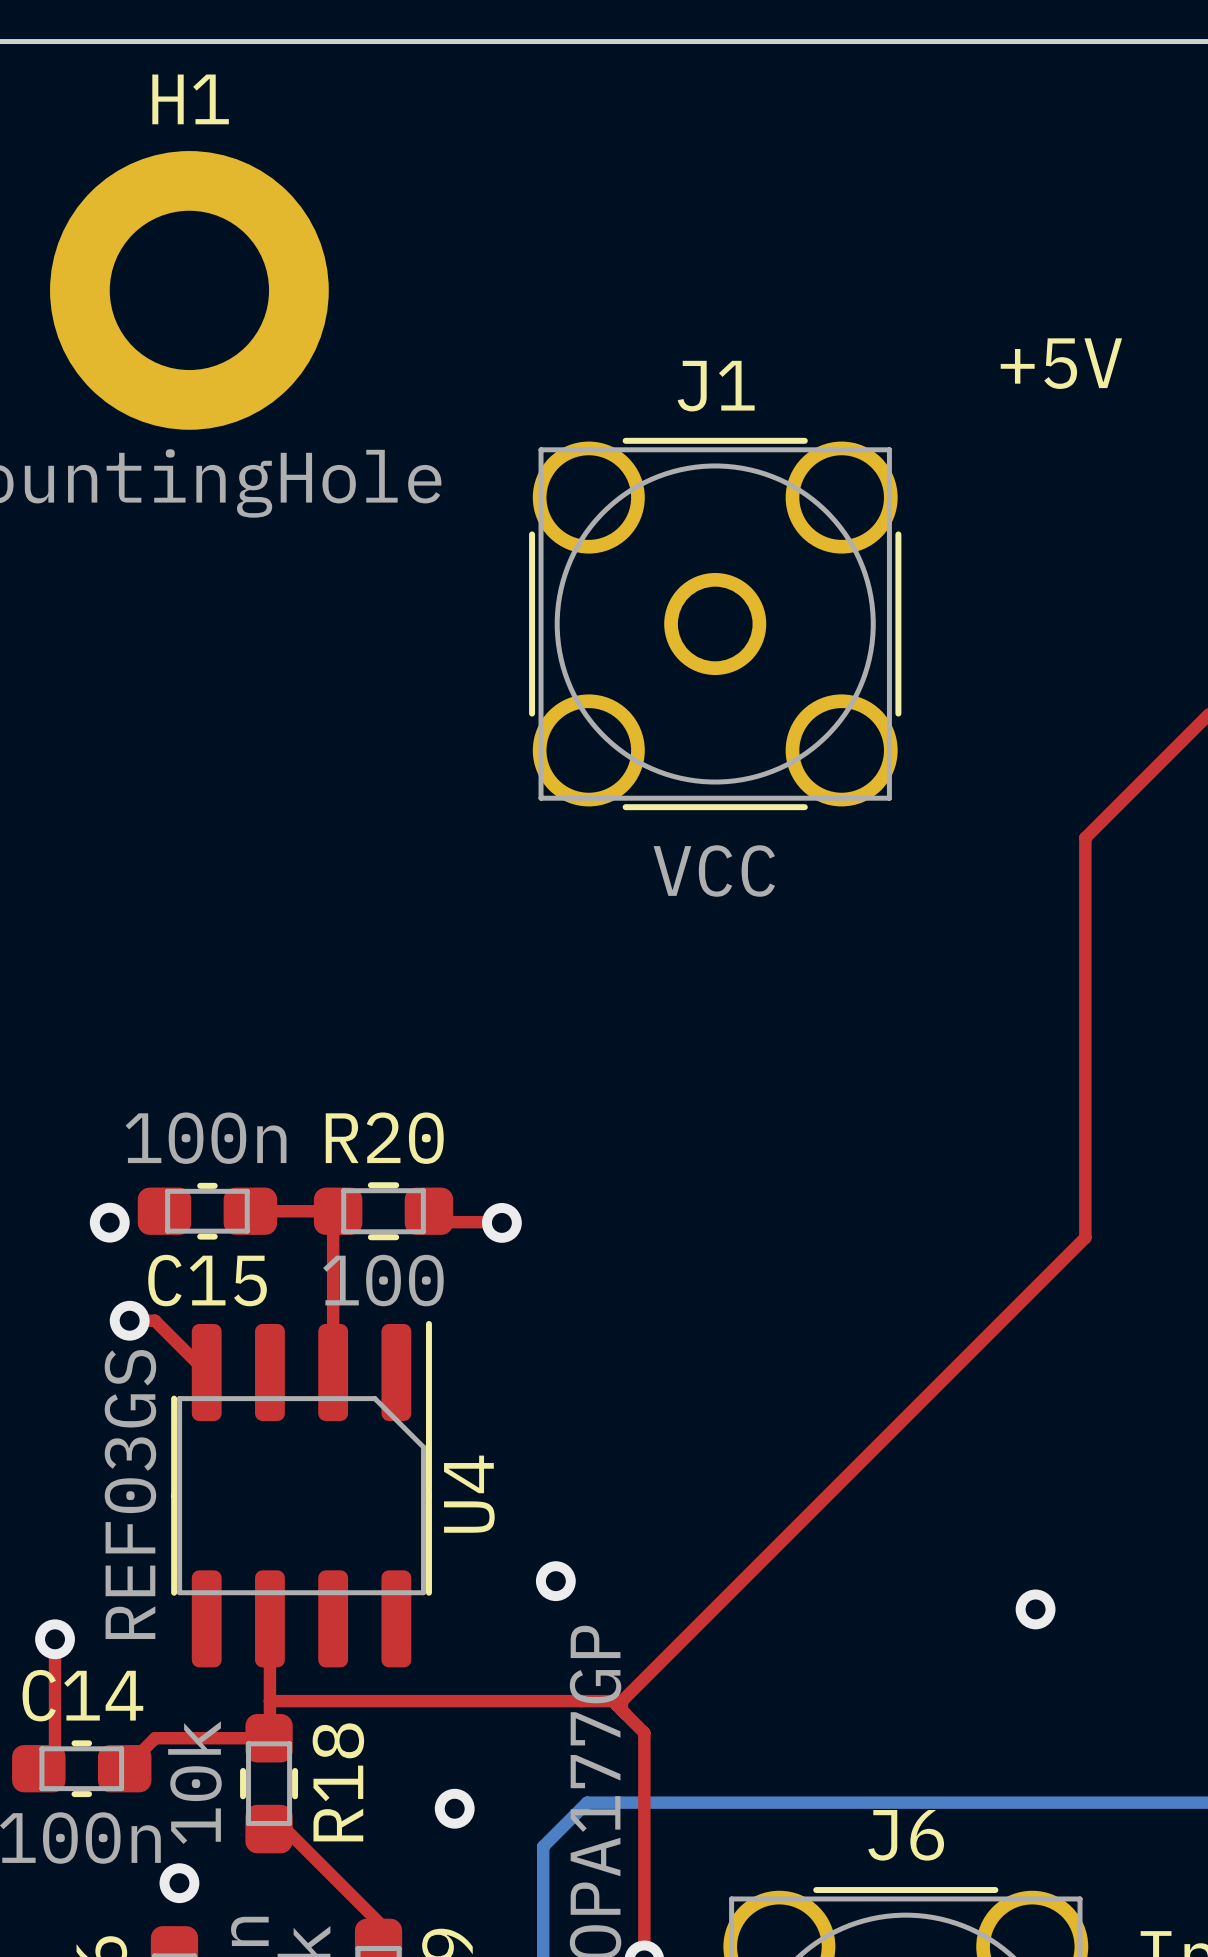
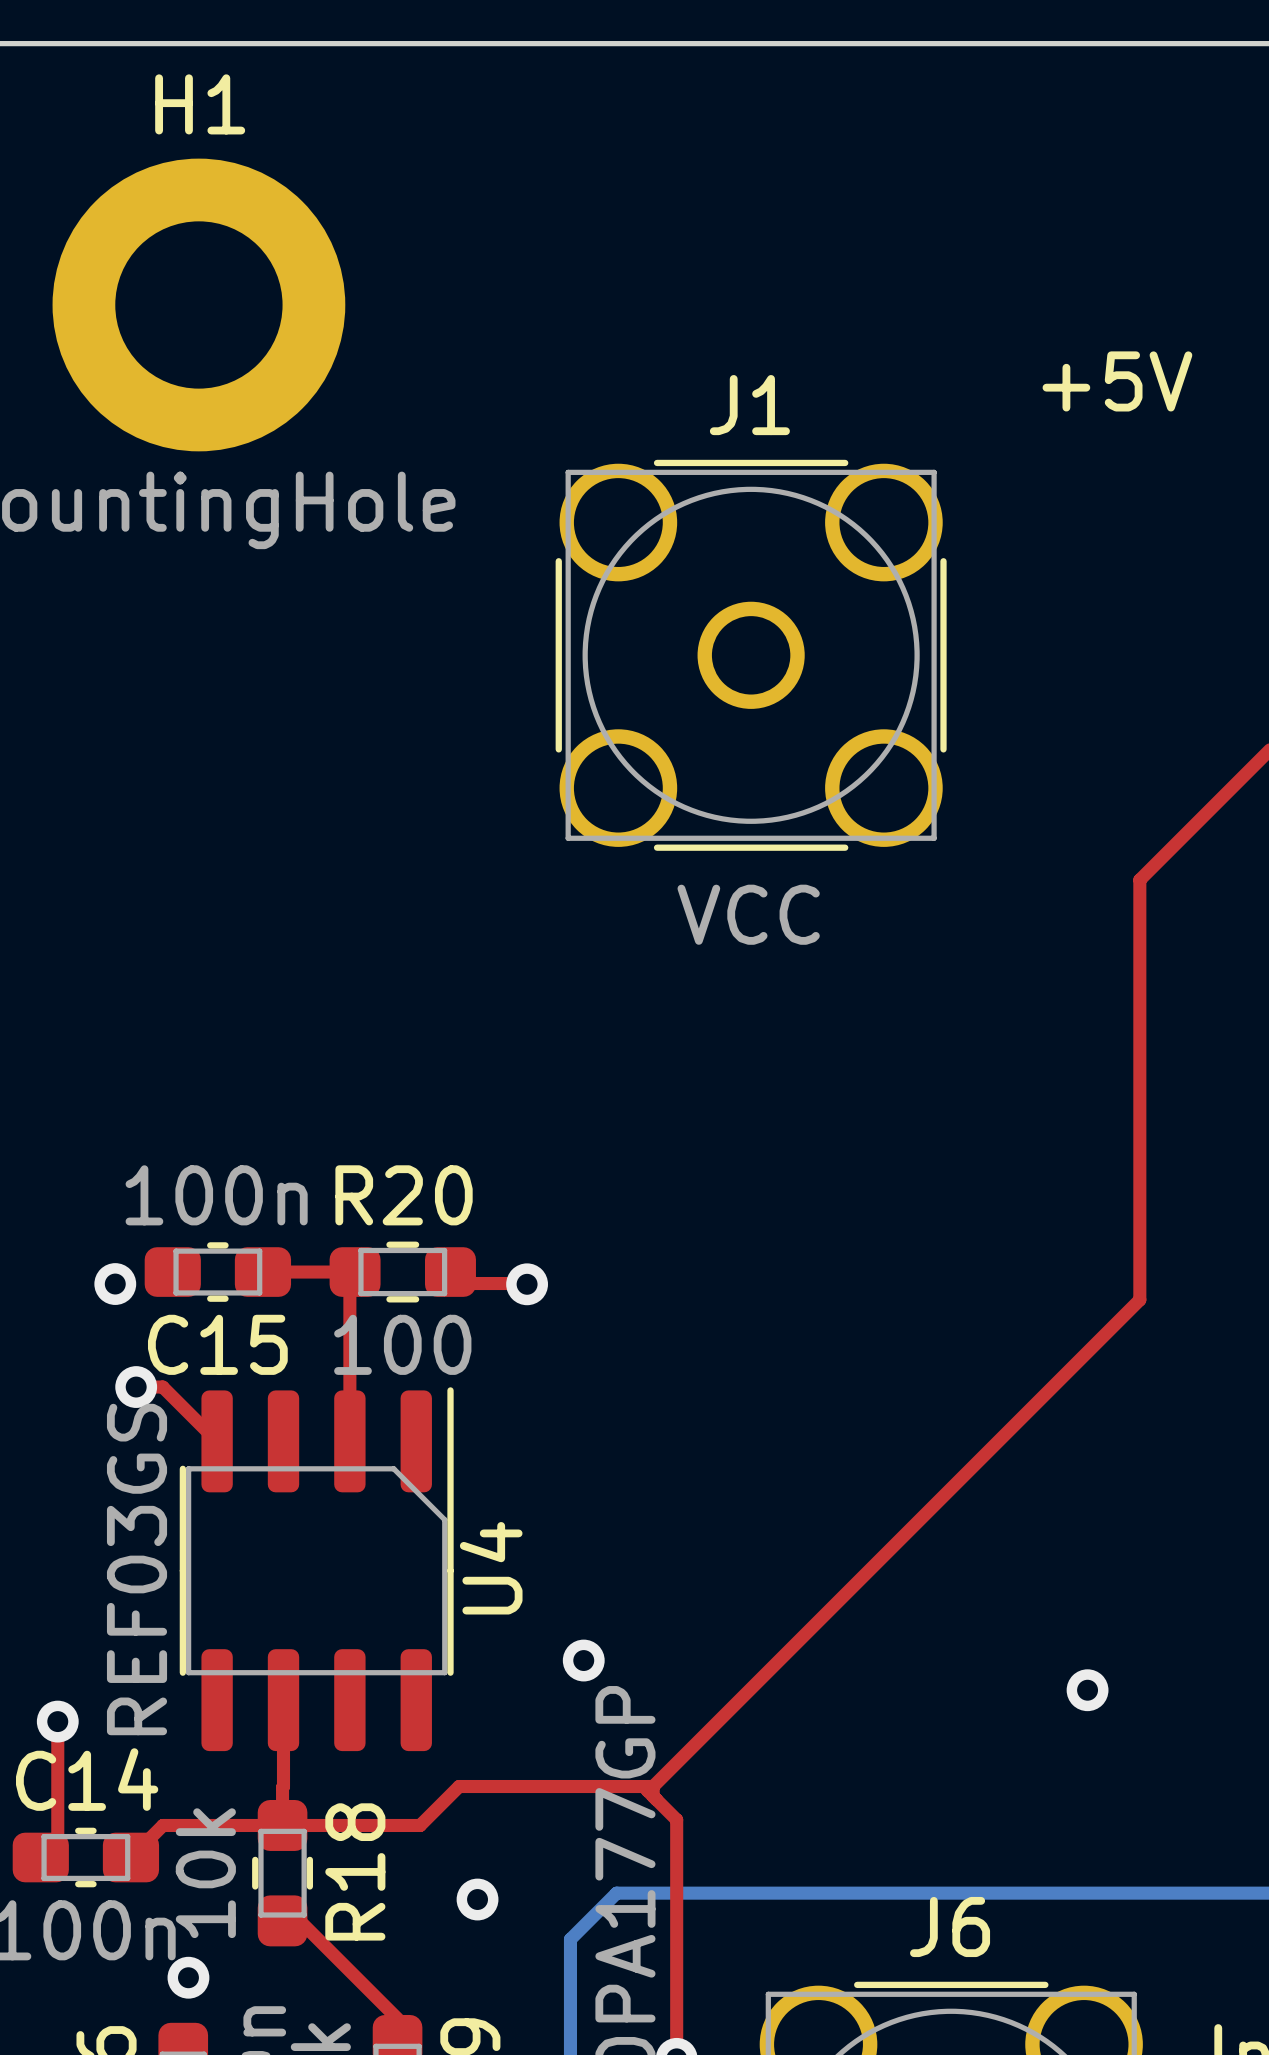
top track: (437, 1701) (269, 1701) (268, 1744) -> (459, 1786) (420, 1825) (282, 1825) (283, 1786)

